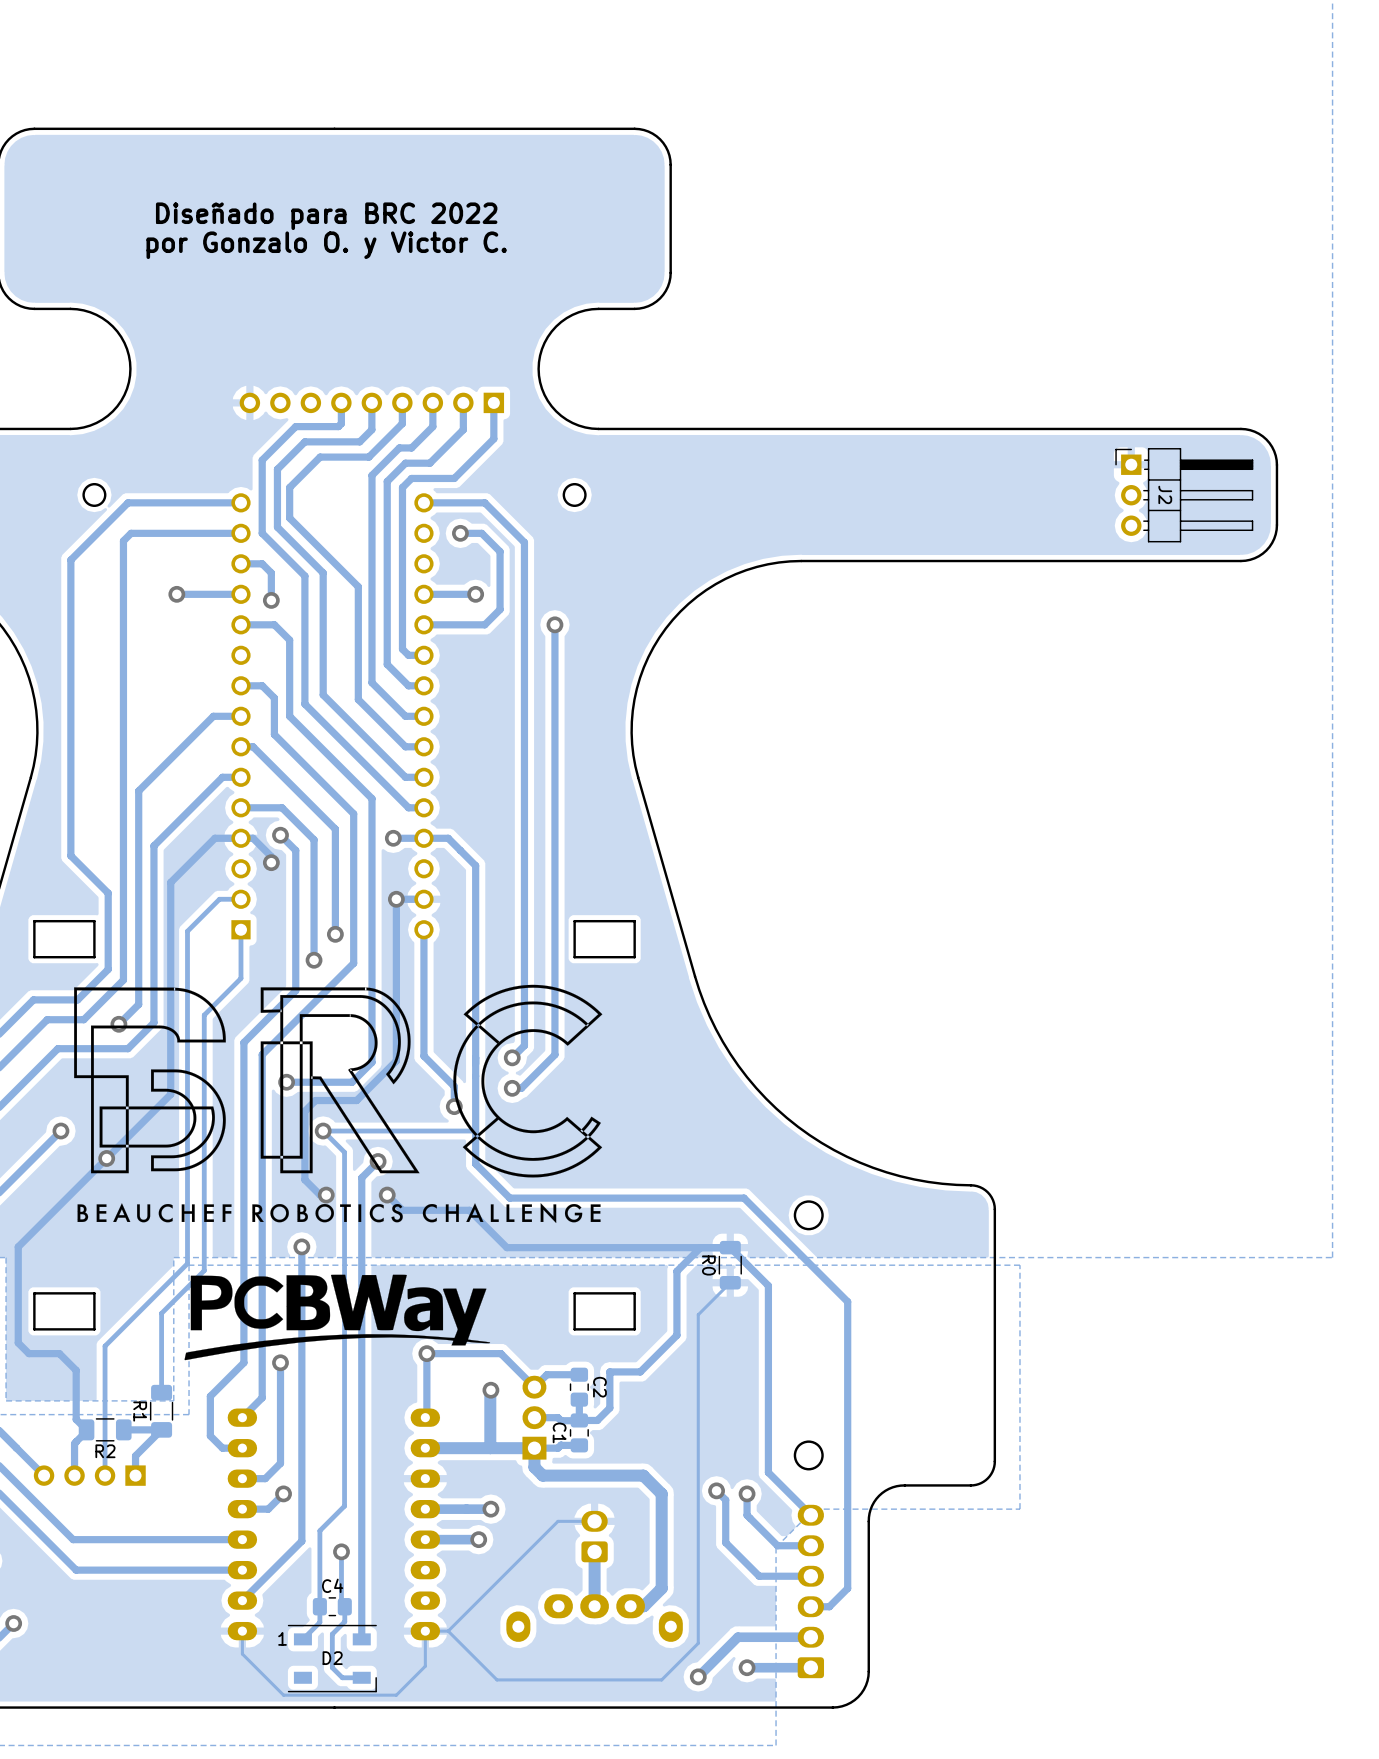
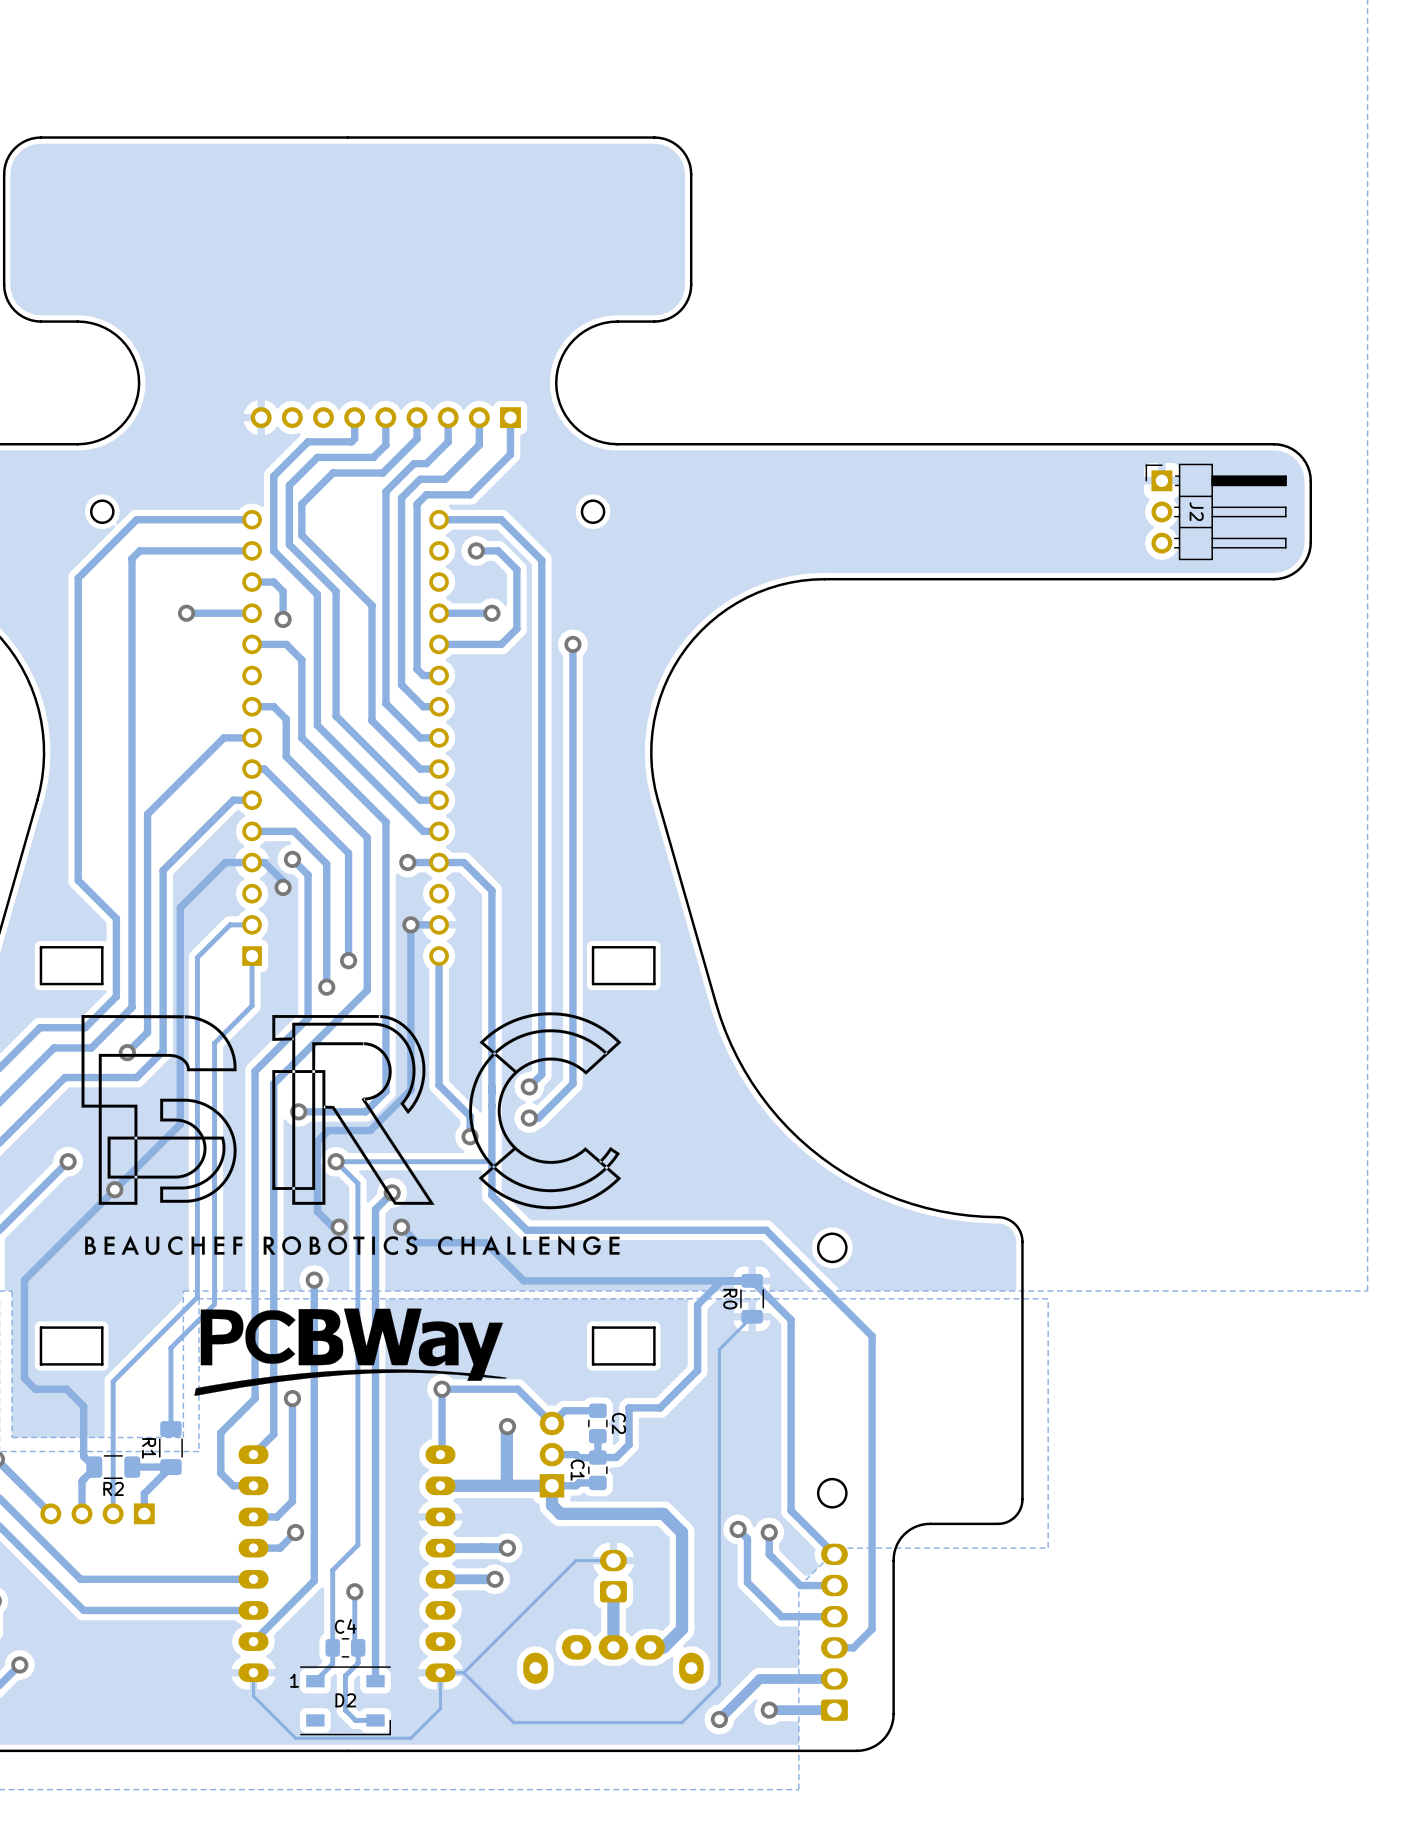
text: Diseñado para BRC 2022 (326, 216) -> none
text: por Gonzalo O. y Victor C. (326, 245) -> none

